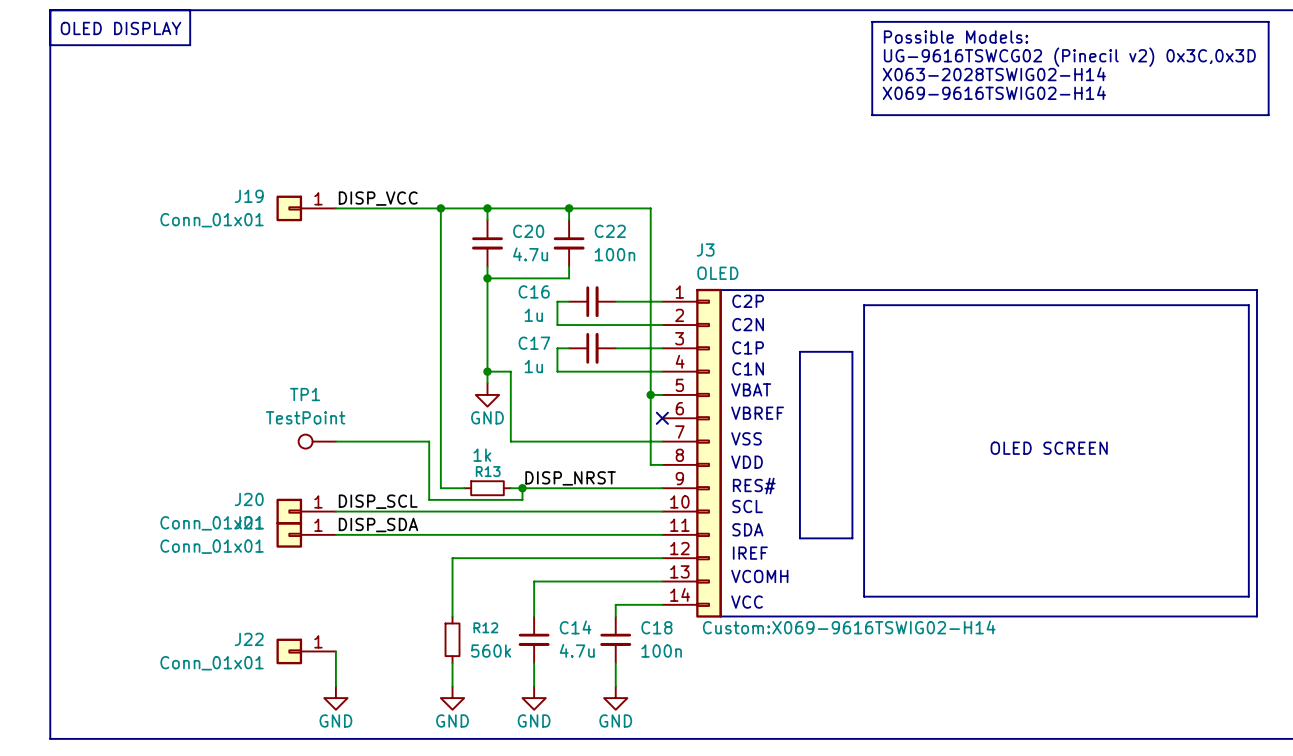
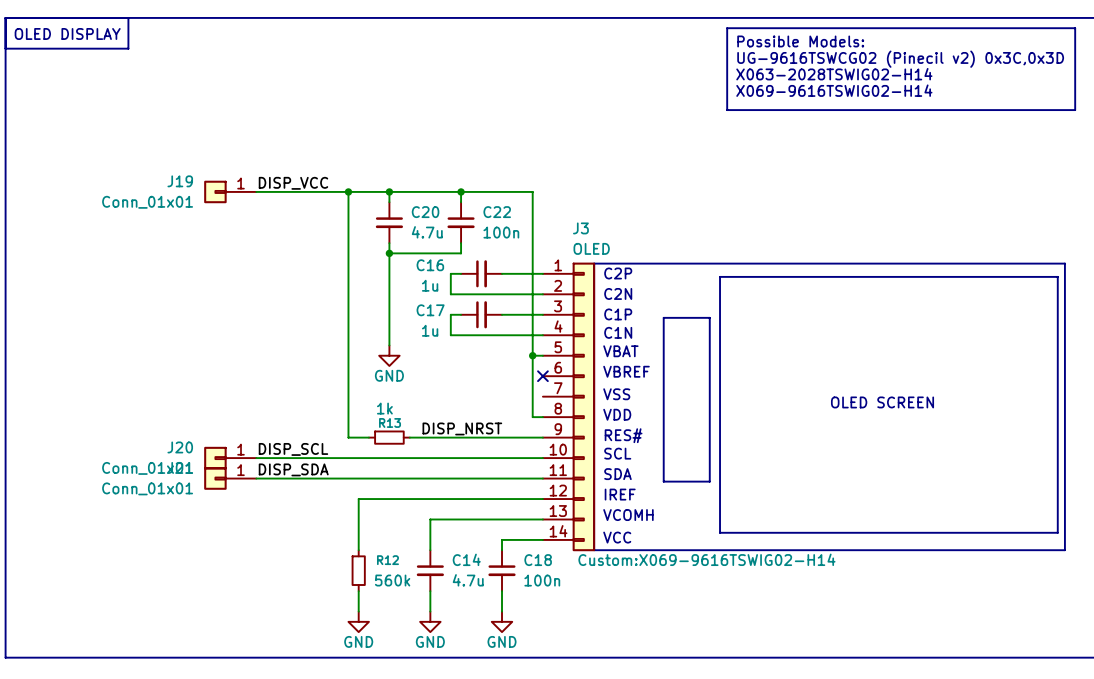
wire: (487, 371) (510, 371) (510, 441) (662, 441) -> none
junction: (487, 371) -> none
TP1: TestPoint (317, 441) -> none
wire: (335, 441) (429, 441) (429, 499) (522, 499) (522, 488) -> none
junction: (522, 488) -> none
J22: Conn_01x01 (306, 651) -> none
wire: (335, 651) (335, 686) -> none
power symbol: GND (335, 698) -> none

